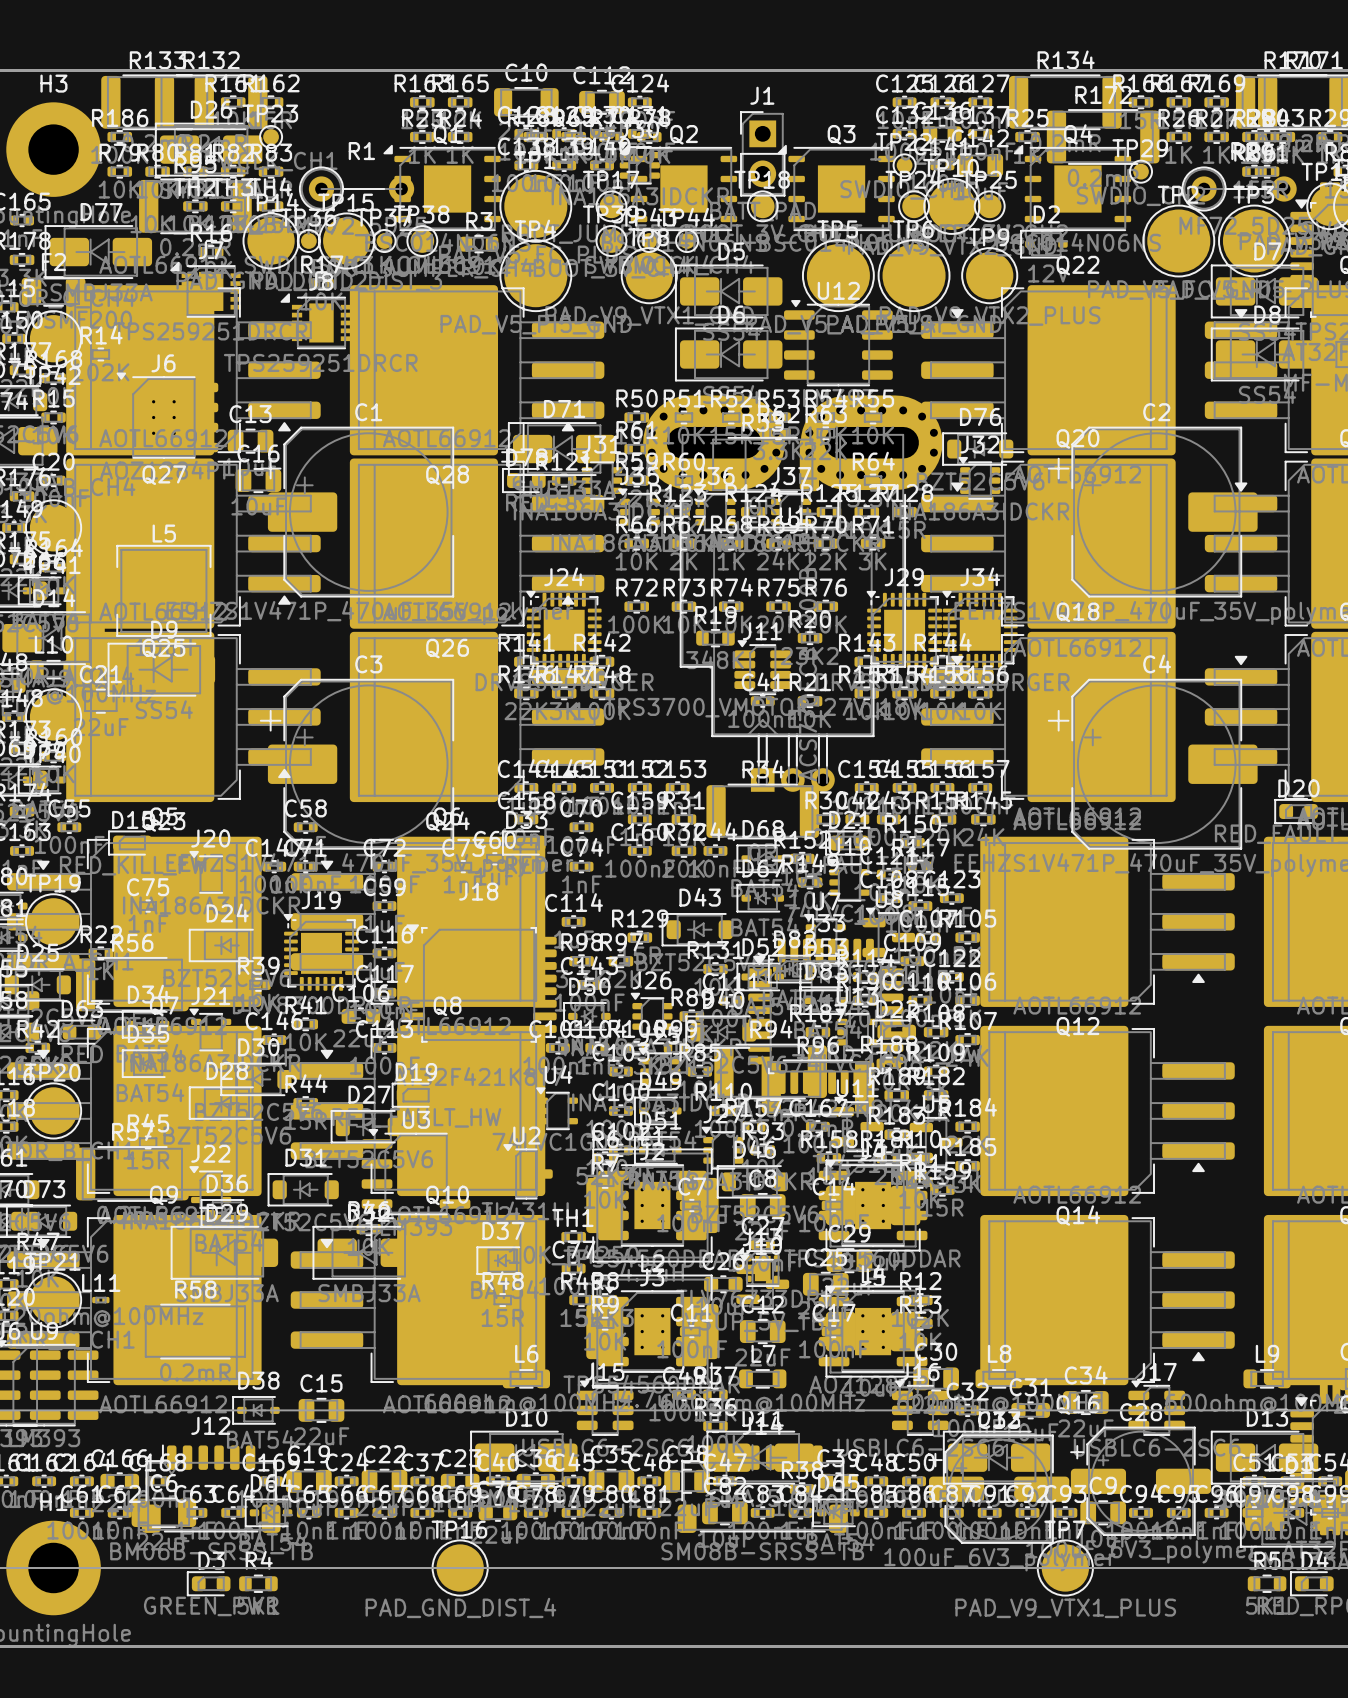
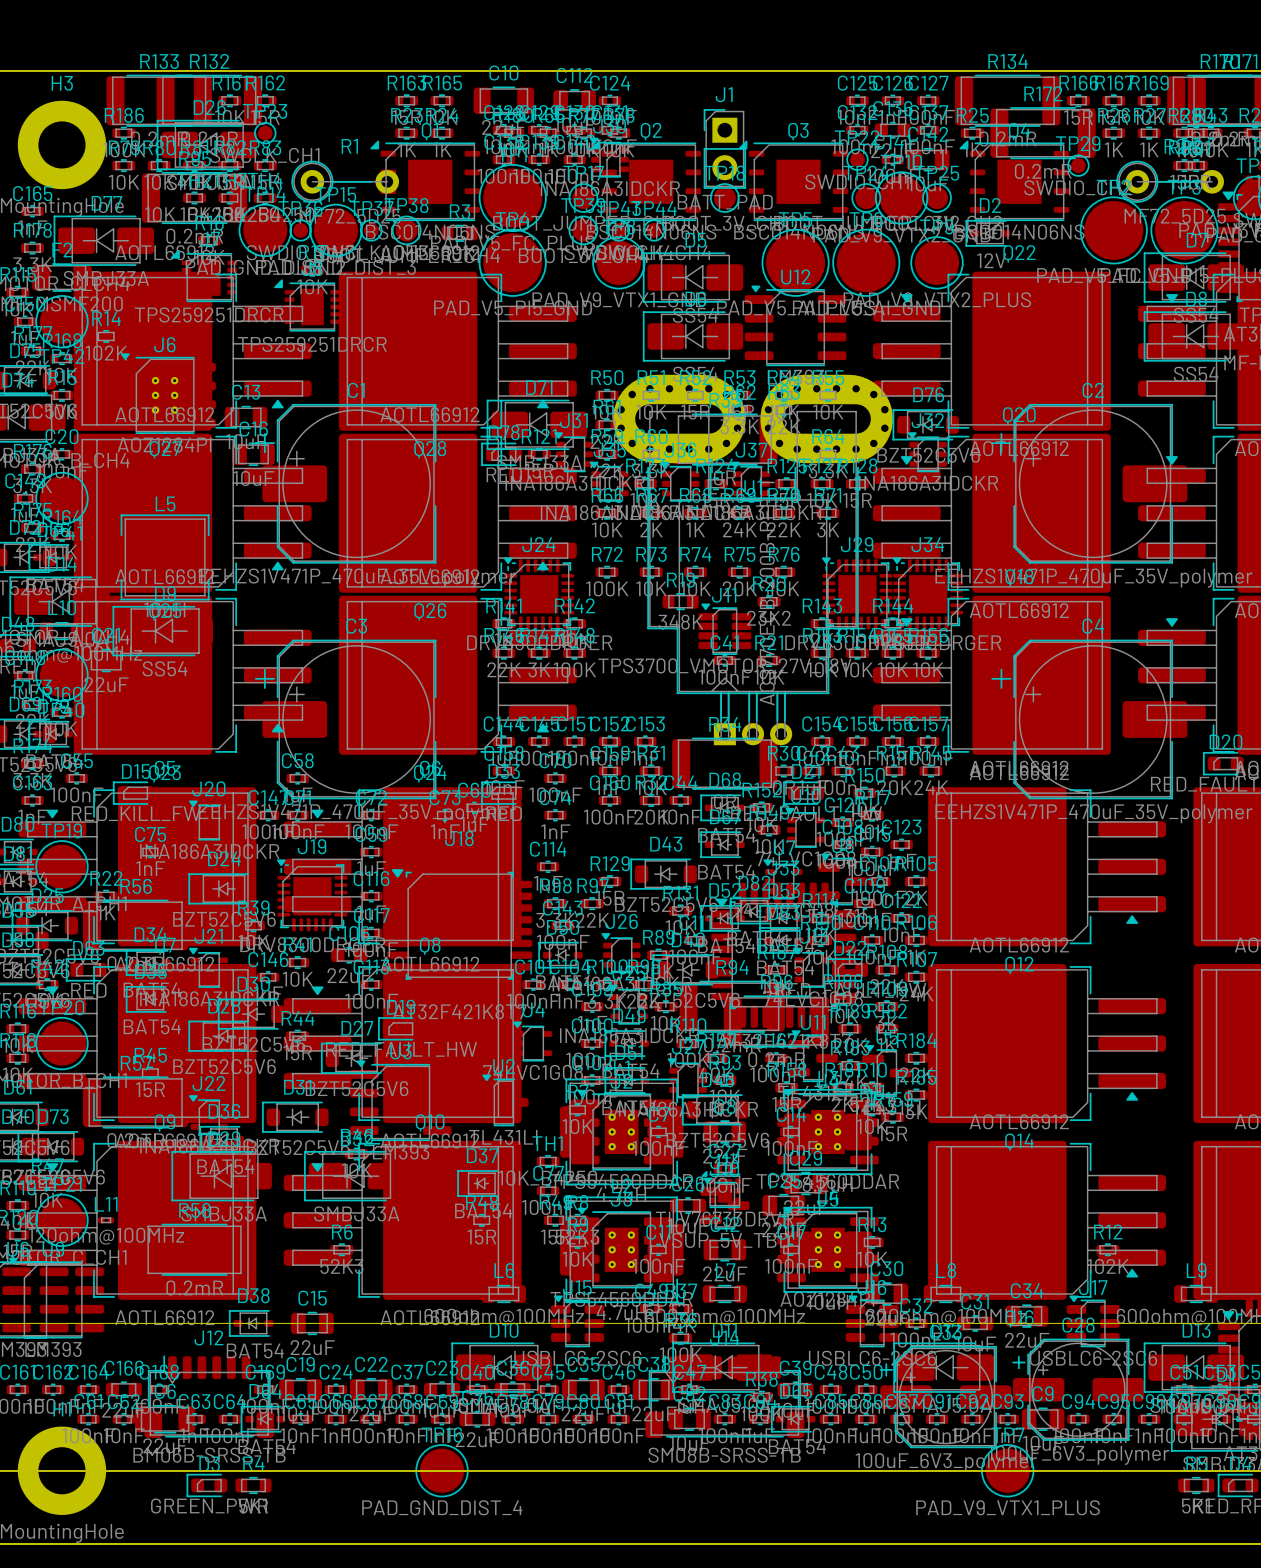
R6 position: (605, 1158) -> (341, 1249)
R12 position: (920, 1300) -> (1107, 1249)

